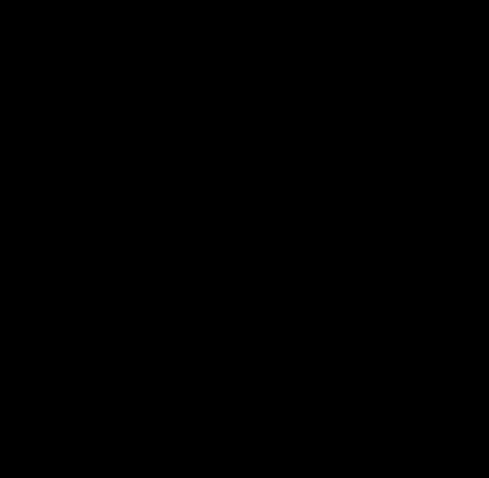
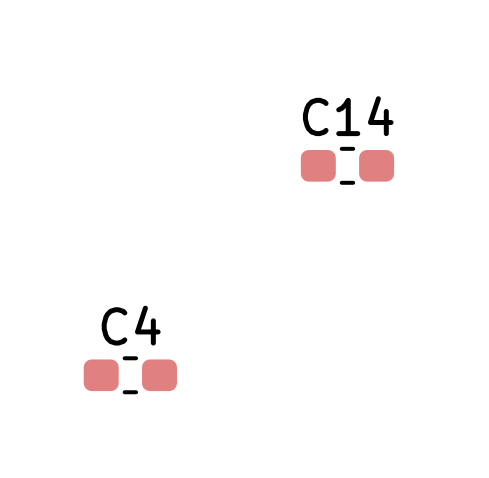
C14: none -> (347, 165)
C4: none -> (130, 375)

